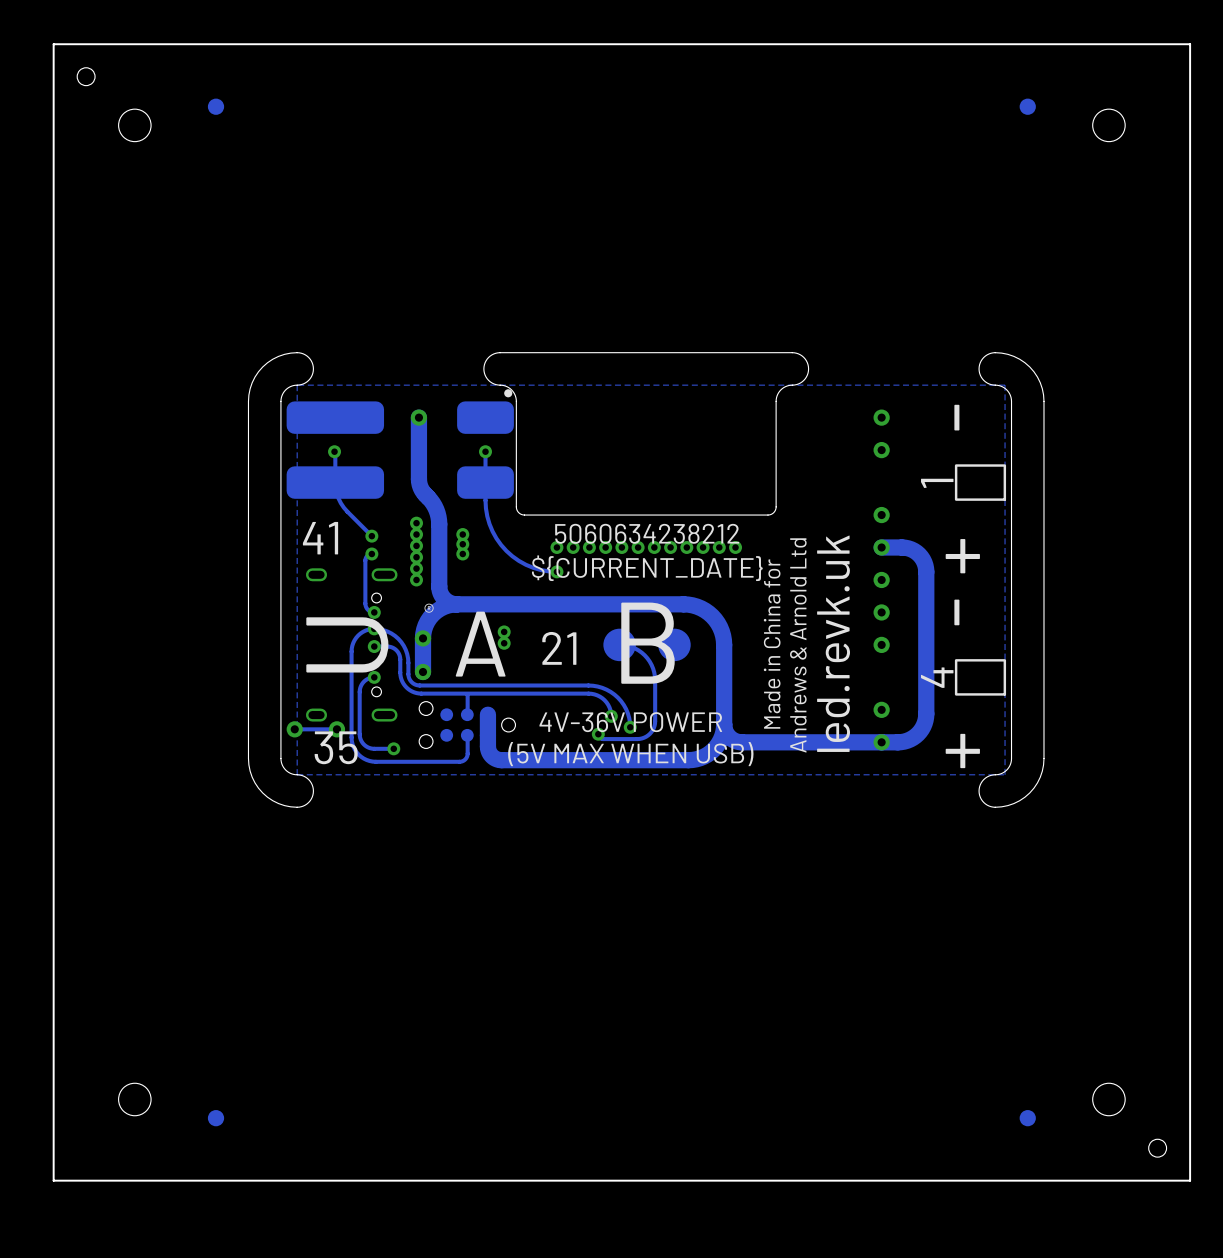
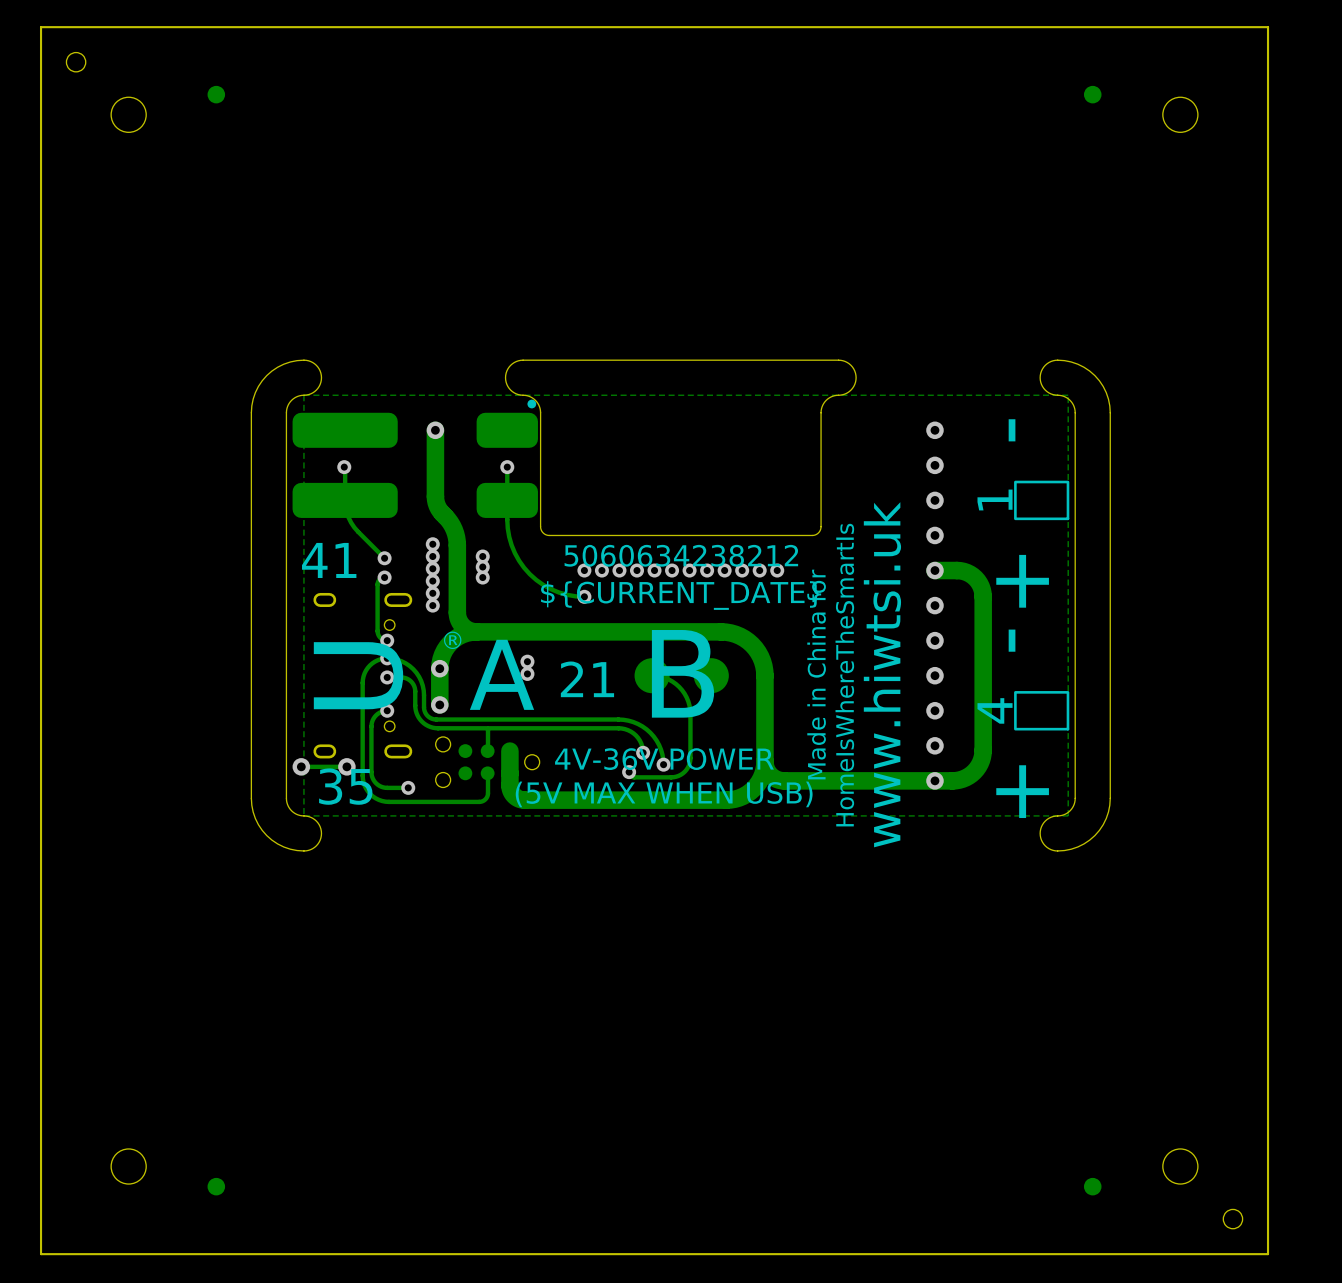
via: none -> (934, 500)
text: led.revk.uk (833, 643) -> www.hiwtsi.uk (882, 674)
text: Andrews & Arnold Ltd (798, 645) -> HomeIsWhereTheSmartIs (844, 675)
via: none -> (934, 710)

